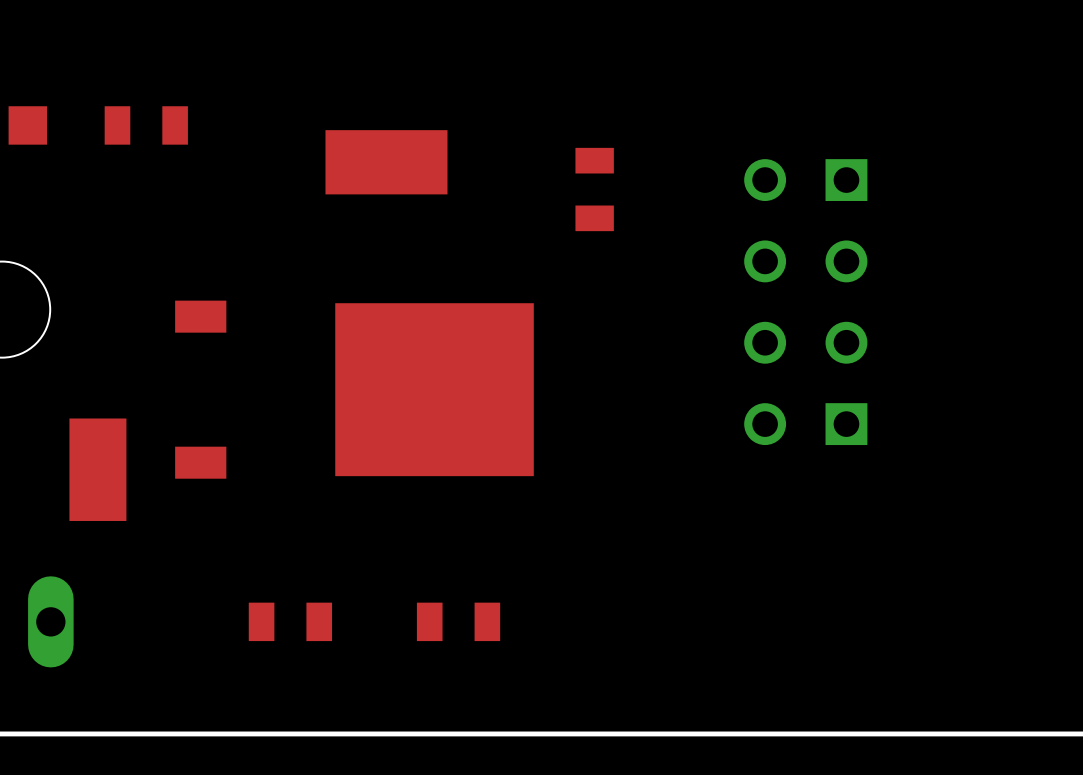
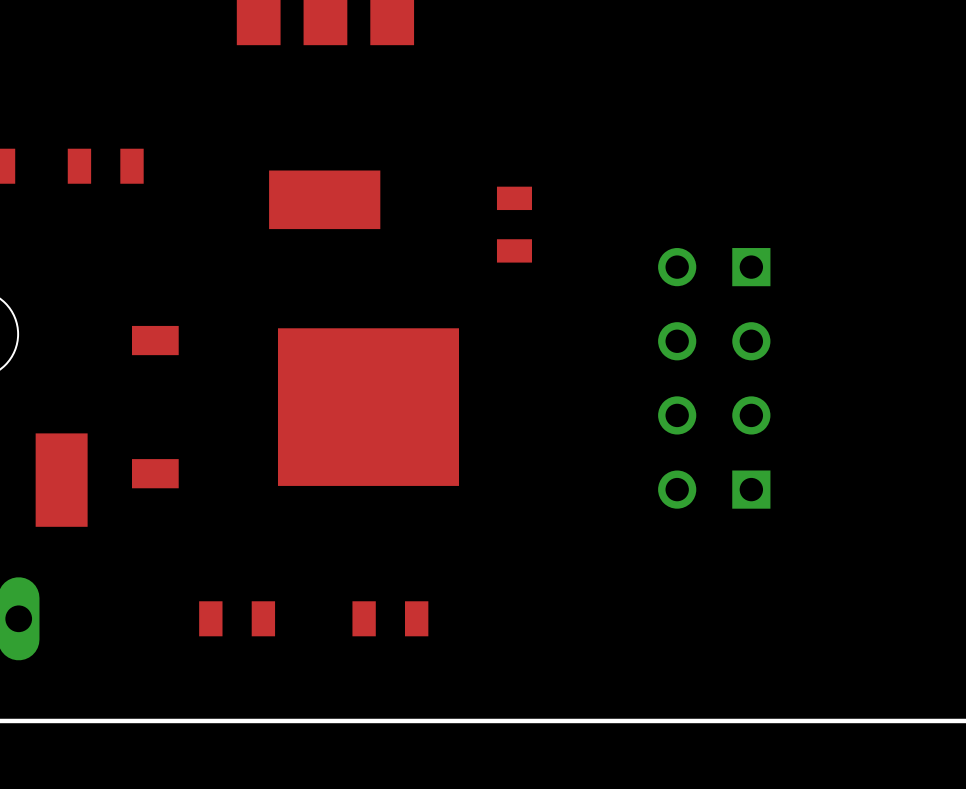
part position: (805, 302) -> (714, 378)

